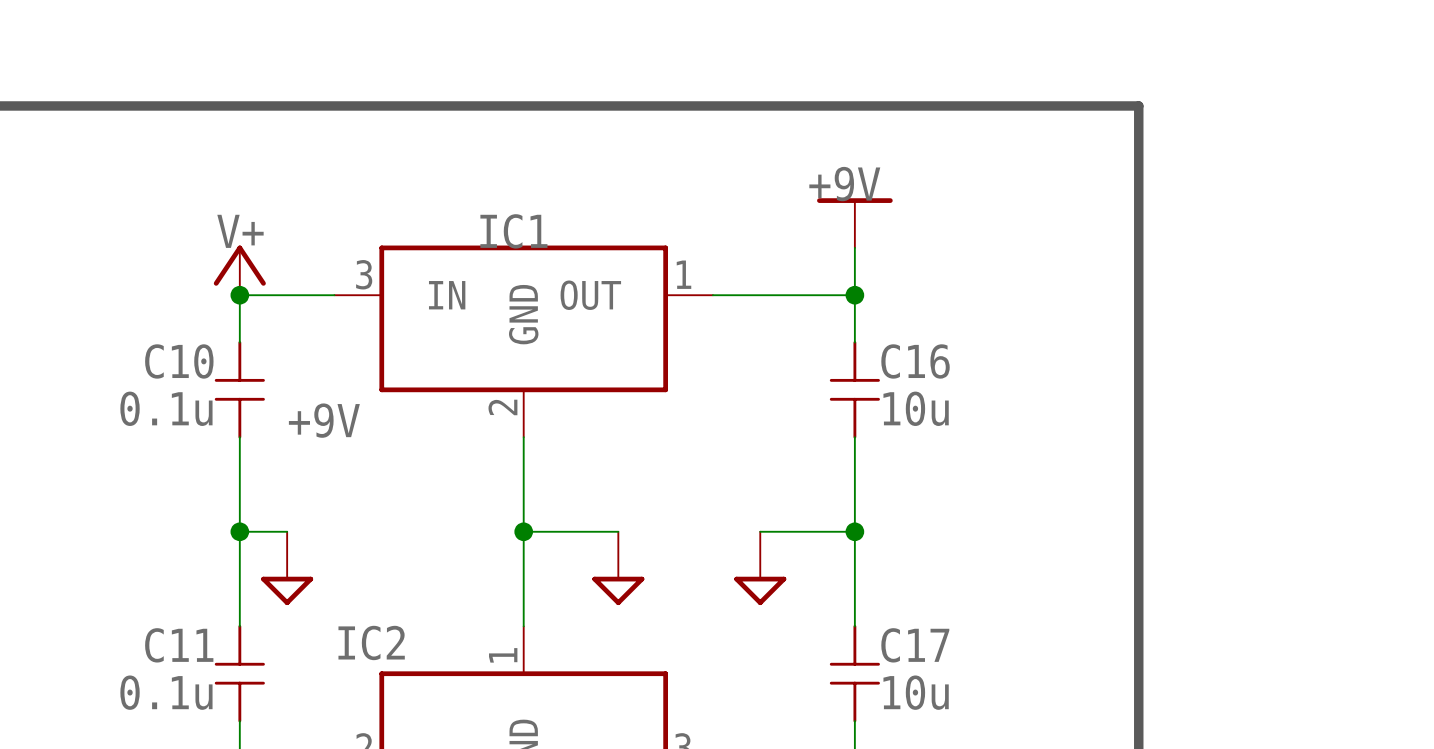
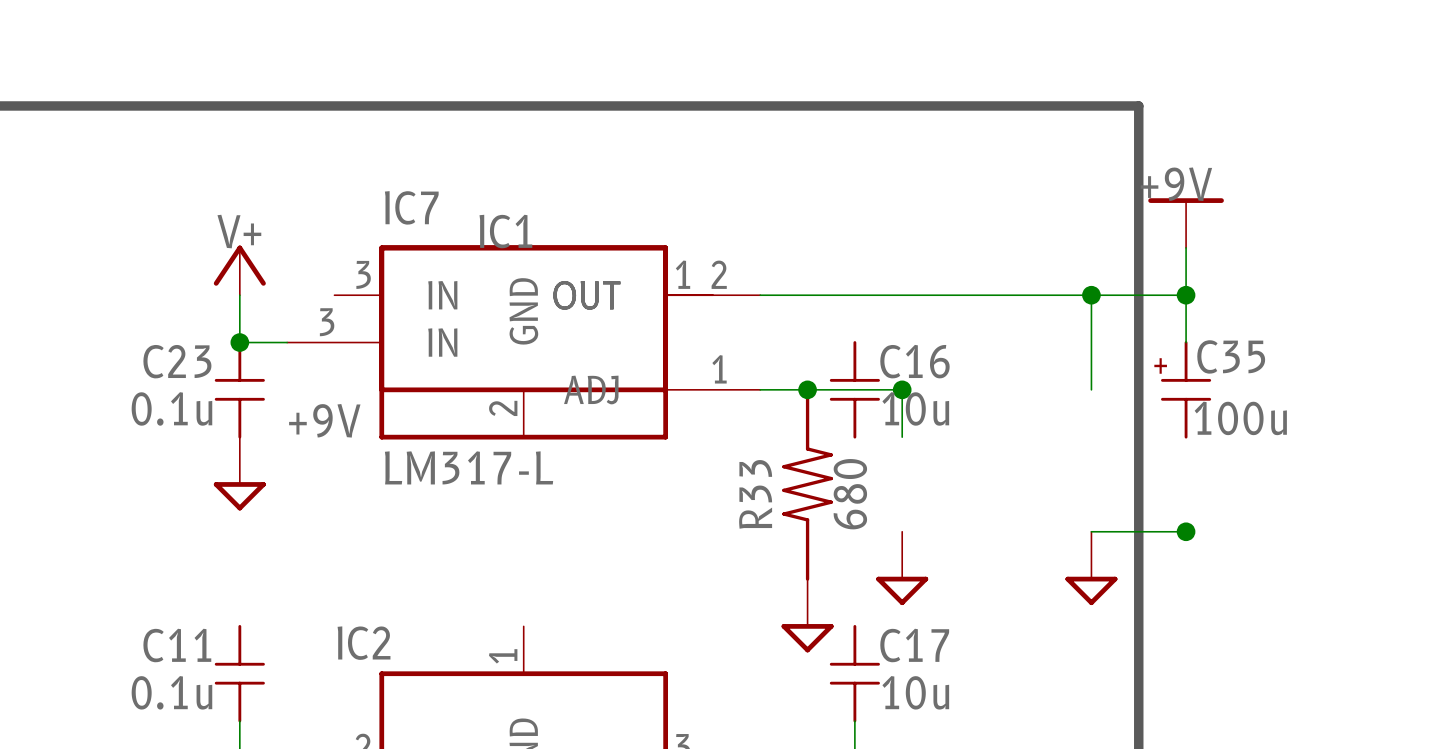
power symbol position: +9V (854, 223) -> +9V (1186, 223)
wire: (854, 247) (854, 342) -> (1186, 247) (1186, 342)
wire: (239, 295) (334, 295) -> none
junction position: (239, 295) -> (239, 342)
wire: none -> (854, 295) (1186, 295)
junction: (854, 295) -> none
wire: none -> (1091, 295) (1091, 389)
junction: none -> (1091, 295)
junction: none -> (1186, 295)
IC7: none -> LM317-L (523, 342)
C10 name: C10 (179, 361) -> C23 (177, 361)
wire: none -> (760, 389) (902, 389) (902, 437)
junction: none -> (807, 389)
junction: none -> (902, 389)
C35: none -> 100u (1186, 389)
wire: (239, 437) (239, 626) -> none
wire: (523, 437) (523, 626) -> none
wire: (854, 437) (854, 626) -> none
R33: none -> 680 (807, 484)
wire: (239, 531) (287, 531) -> (239, 342) (287, 342)
junction: (239, 531) -> none
wire: (523, 531) (618, 531) -> none
junction: (523, 531) -> none
wire: (760, 531) (854, 531) -> (1091, 531) (1186, 531)
junction: (854, 531) -> none
junction: none -> (1186, 531)
power symbol position: (287, 568) -> (239, 473)
power symbol: (618, 568) -> none
power symbol position: (760, 568) -> (807, 615)
power symbol: none -> (902, 568)
power symbol: none -> (1091, 568)

